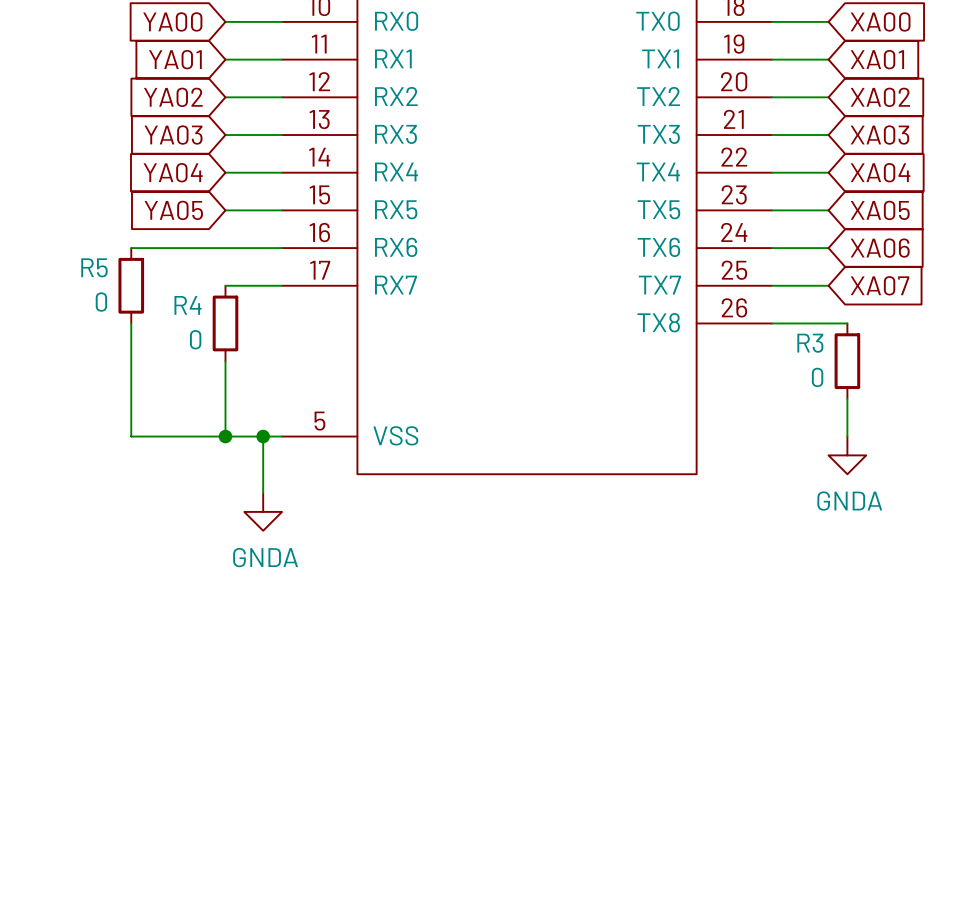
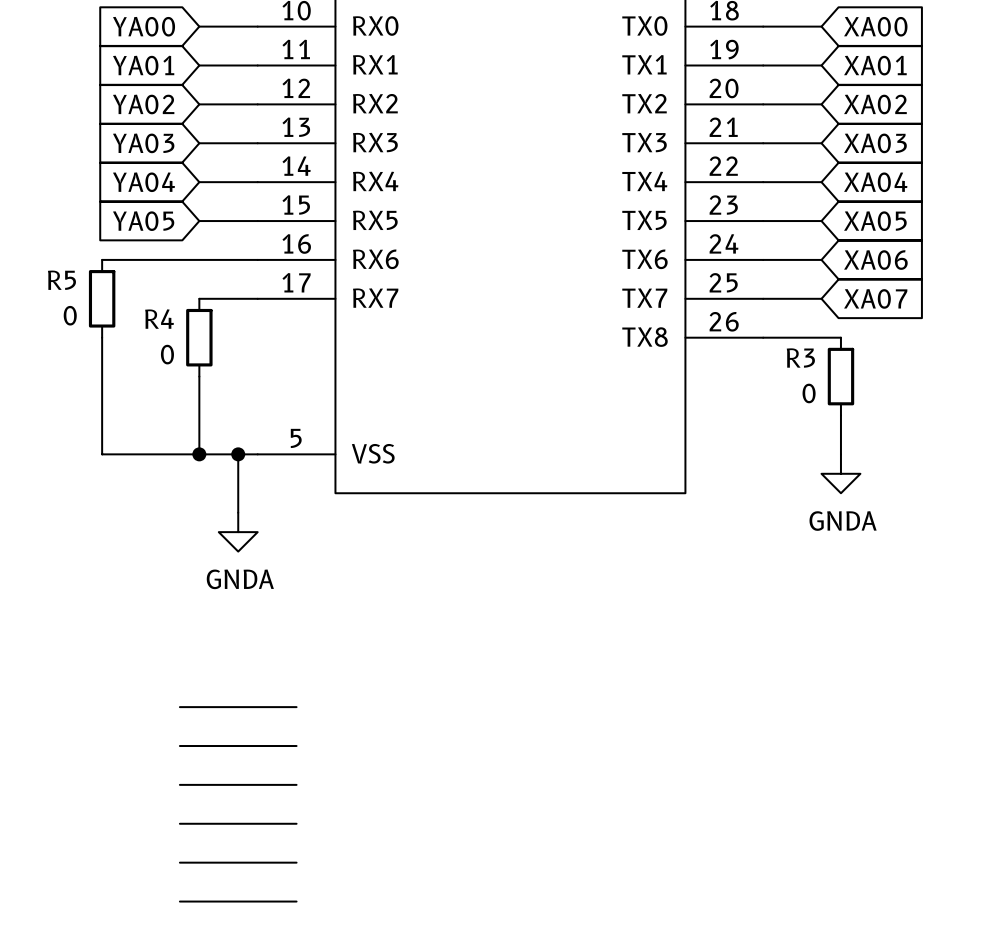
wire: none -> (179, 707) (296, 707)
wire: none -> (179, 746) (296, 746)
wire: none -> (179, 784) (296, 784)
wire: none -> (179, 823) (296, 823)
wire: none -> (179, 862) (296, 862)
wire: none -> (179, 901) (296, 901)

